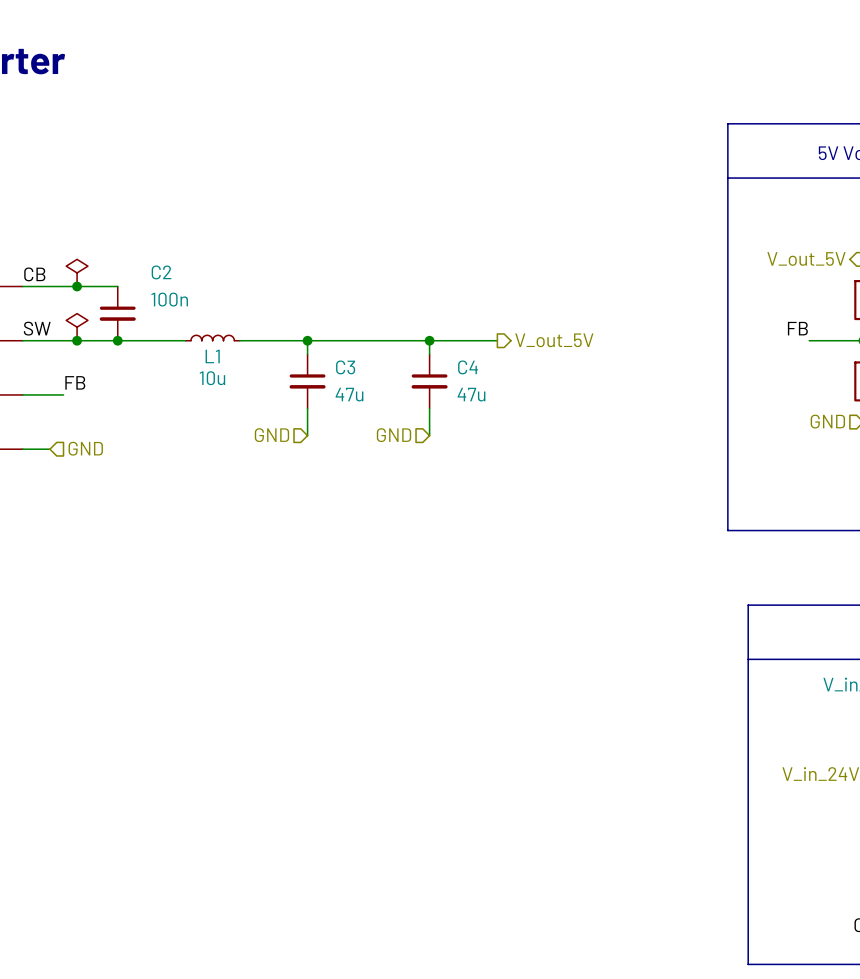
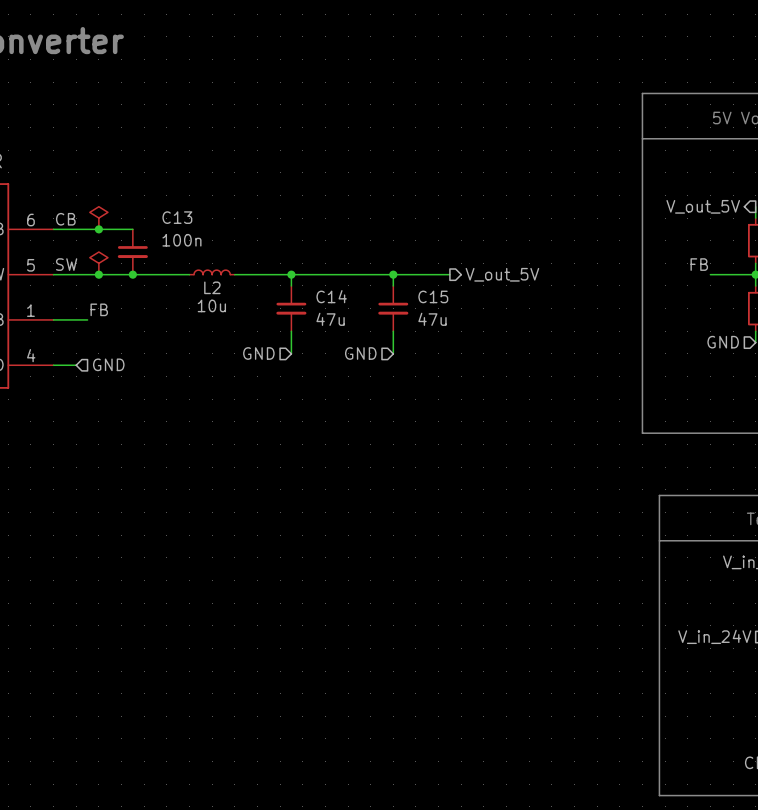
C2 name: C2 (161, 272) -> C13 (177, 217)
L1 name: L1 (212, 356) -> L2 (212, 287)
C3 name: C3 (345, 367) -> C14 (331, 296)
C4 name: C4 (468, 367) -> C15 (433, 296)

